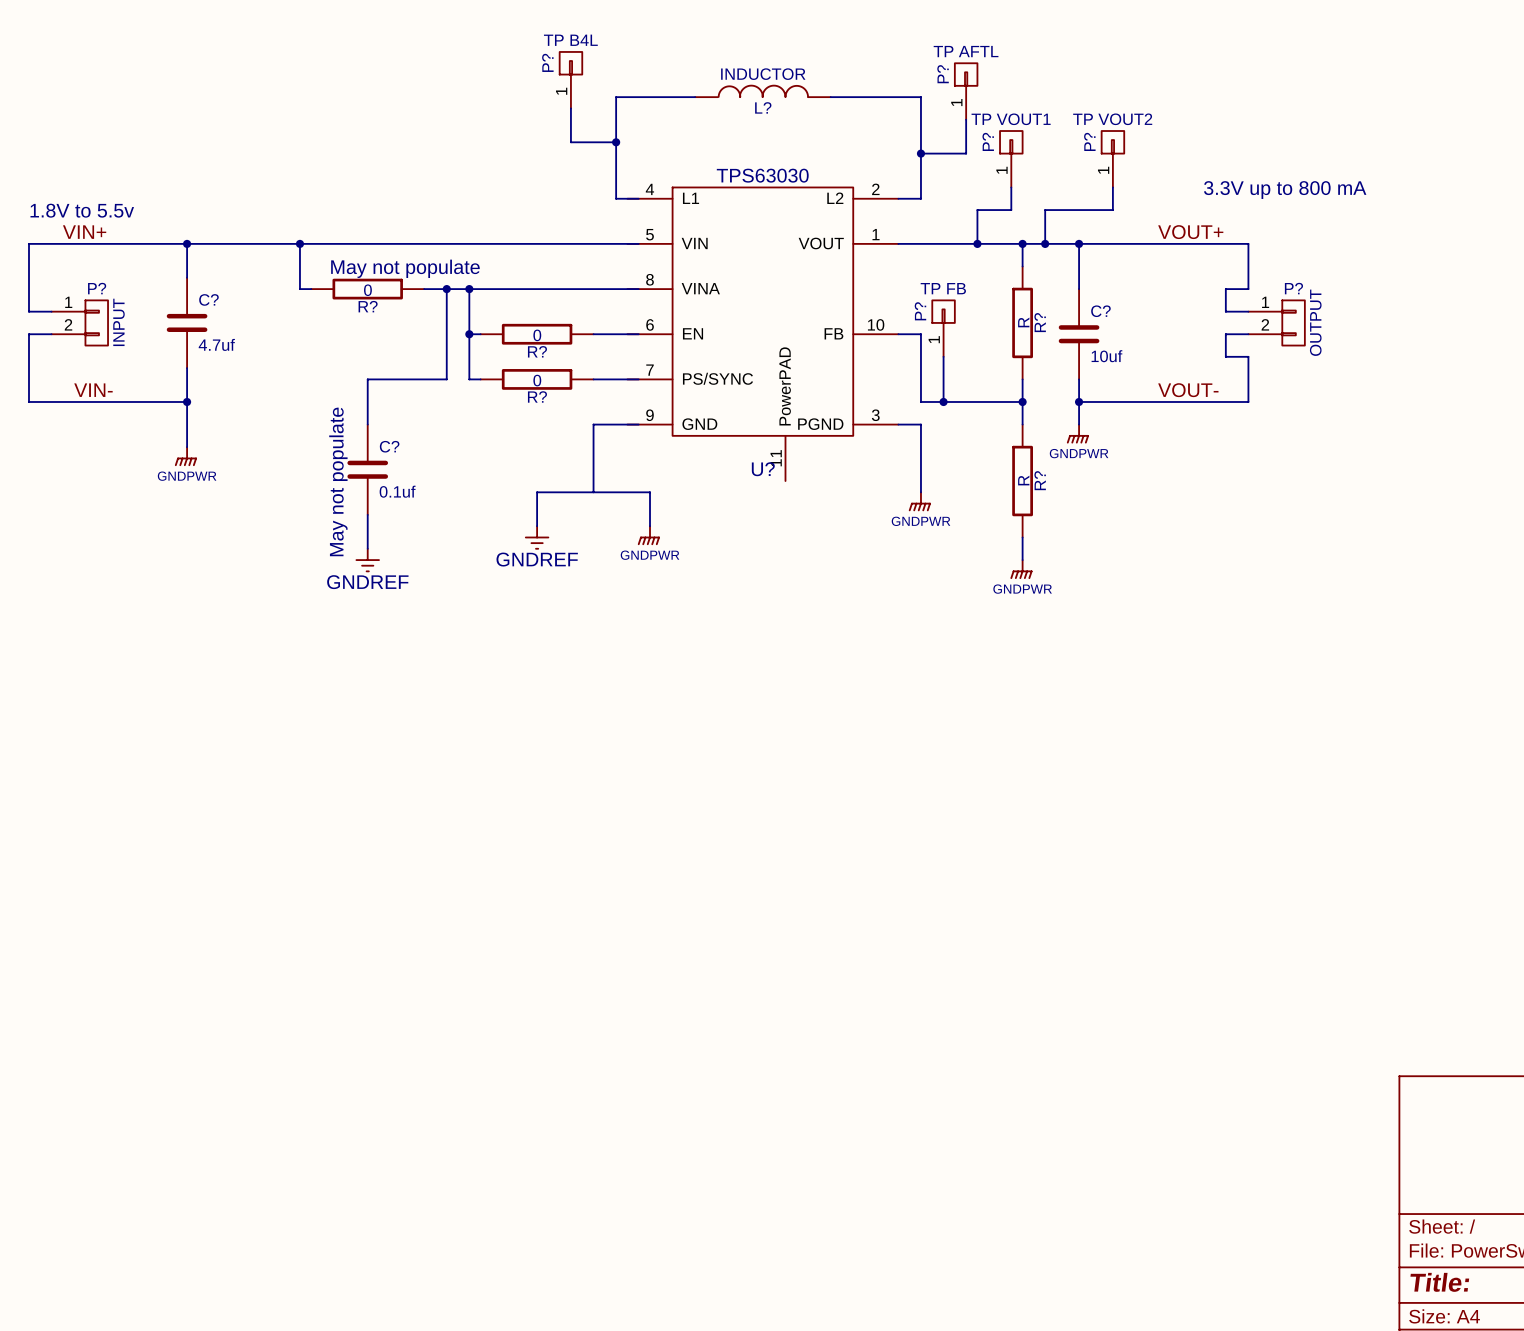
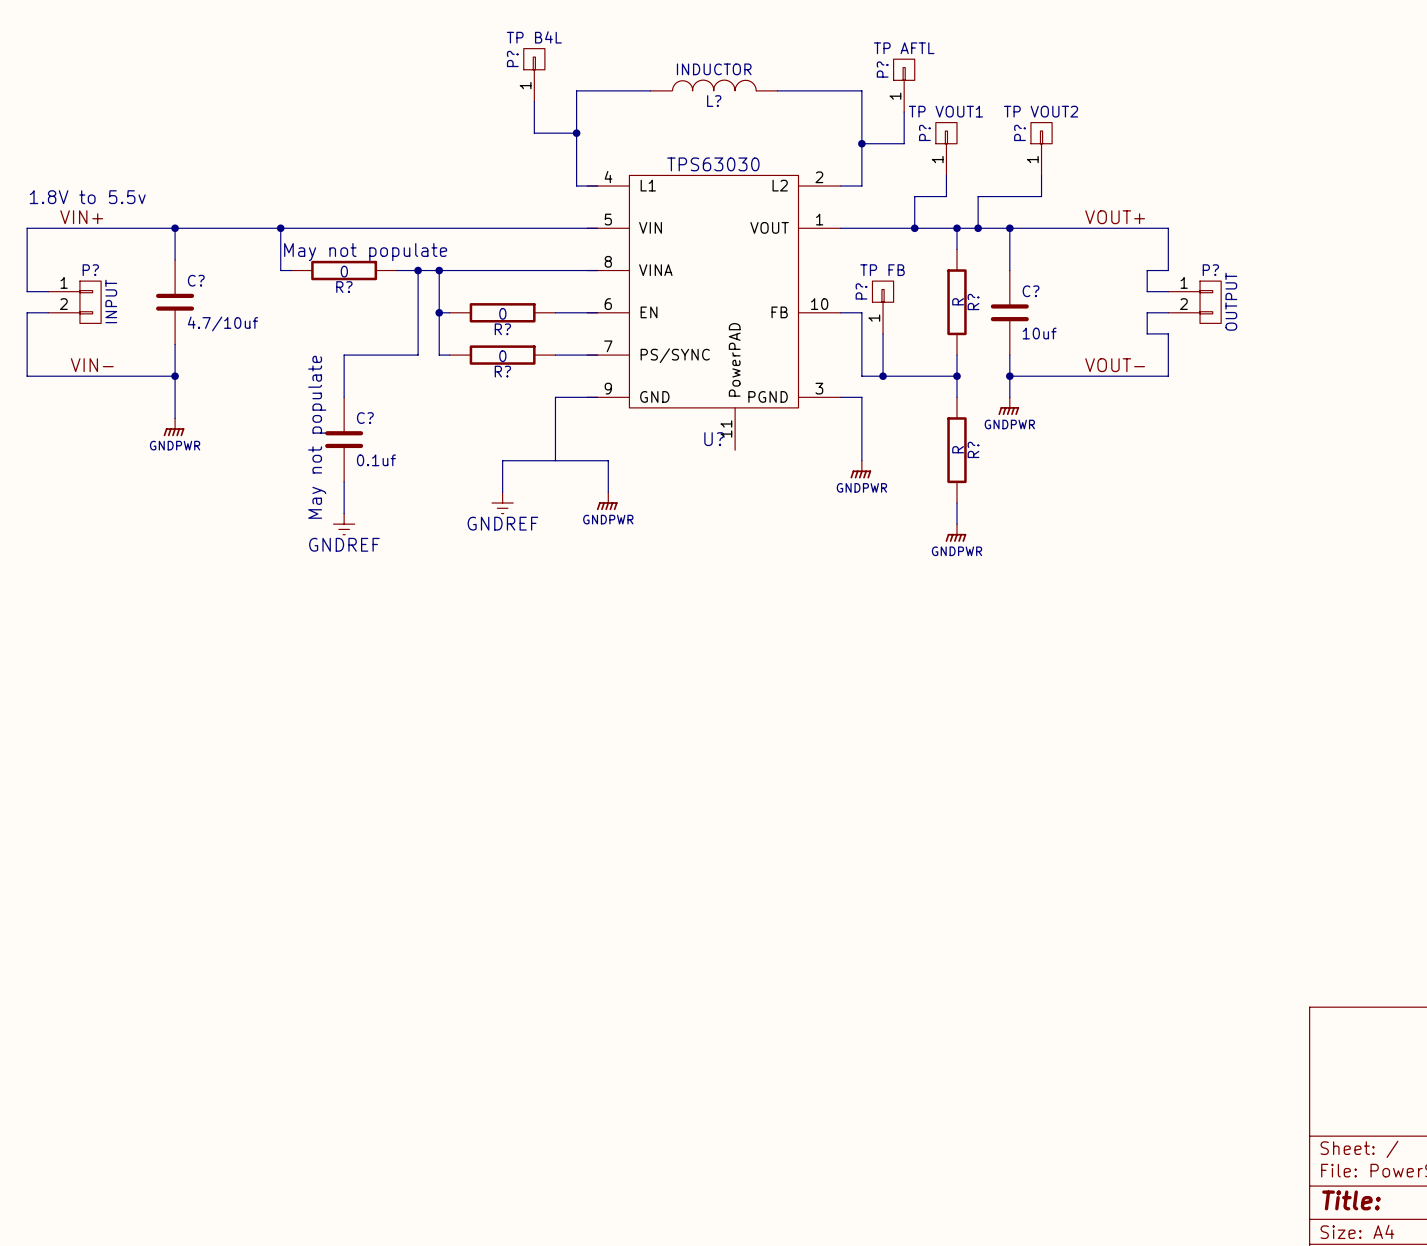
text: 3.3V up to 800 mA (1285, 190) -> none
C? value: 4.7uf (216, 344) -> 4.7/10uf (222, 323)

